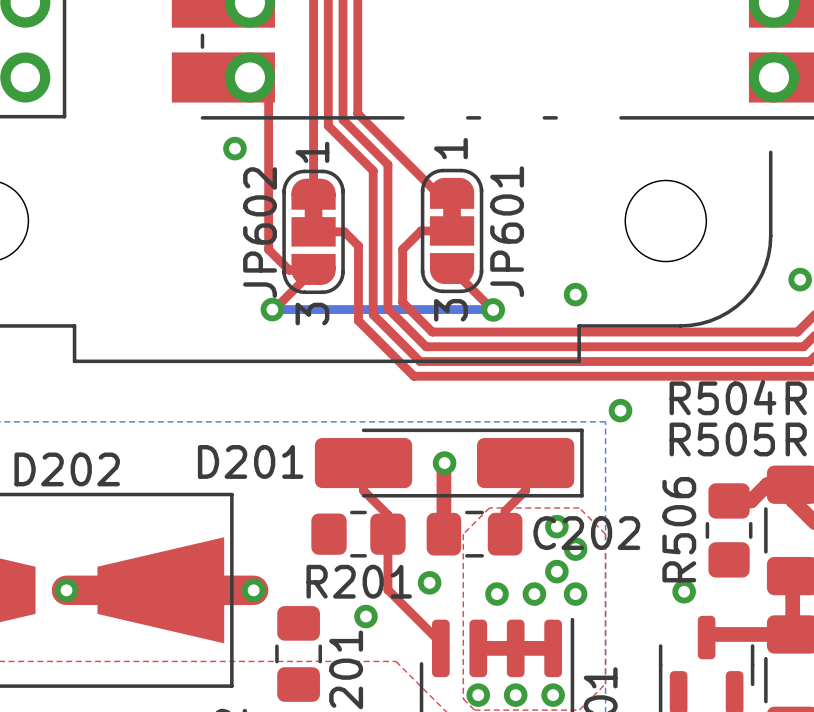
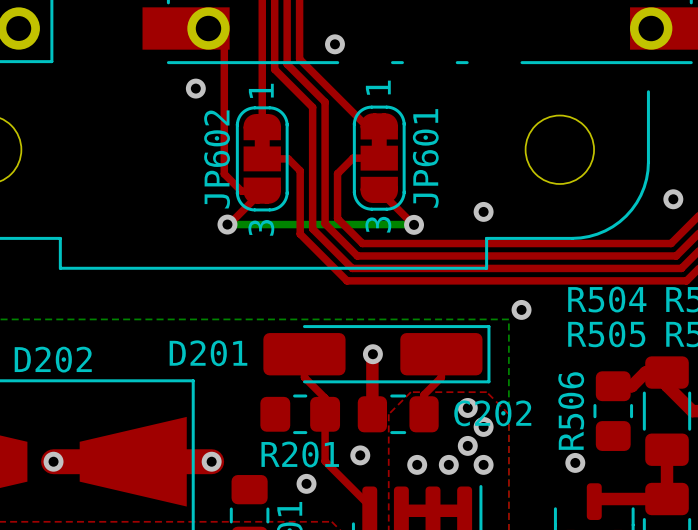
via: none -> (334, 44)

